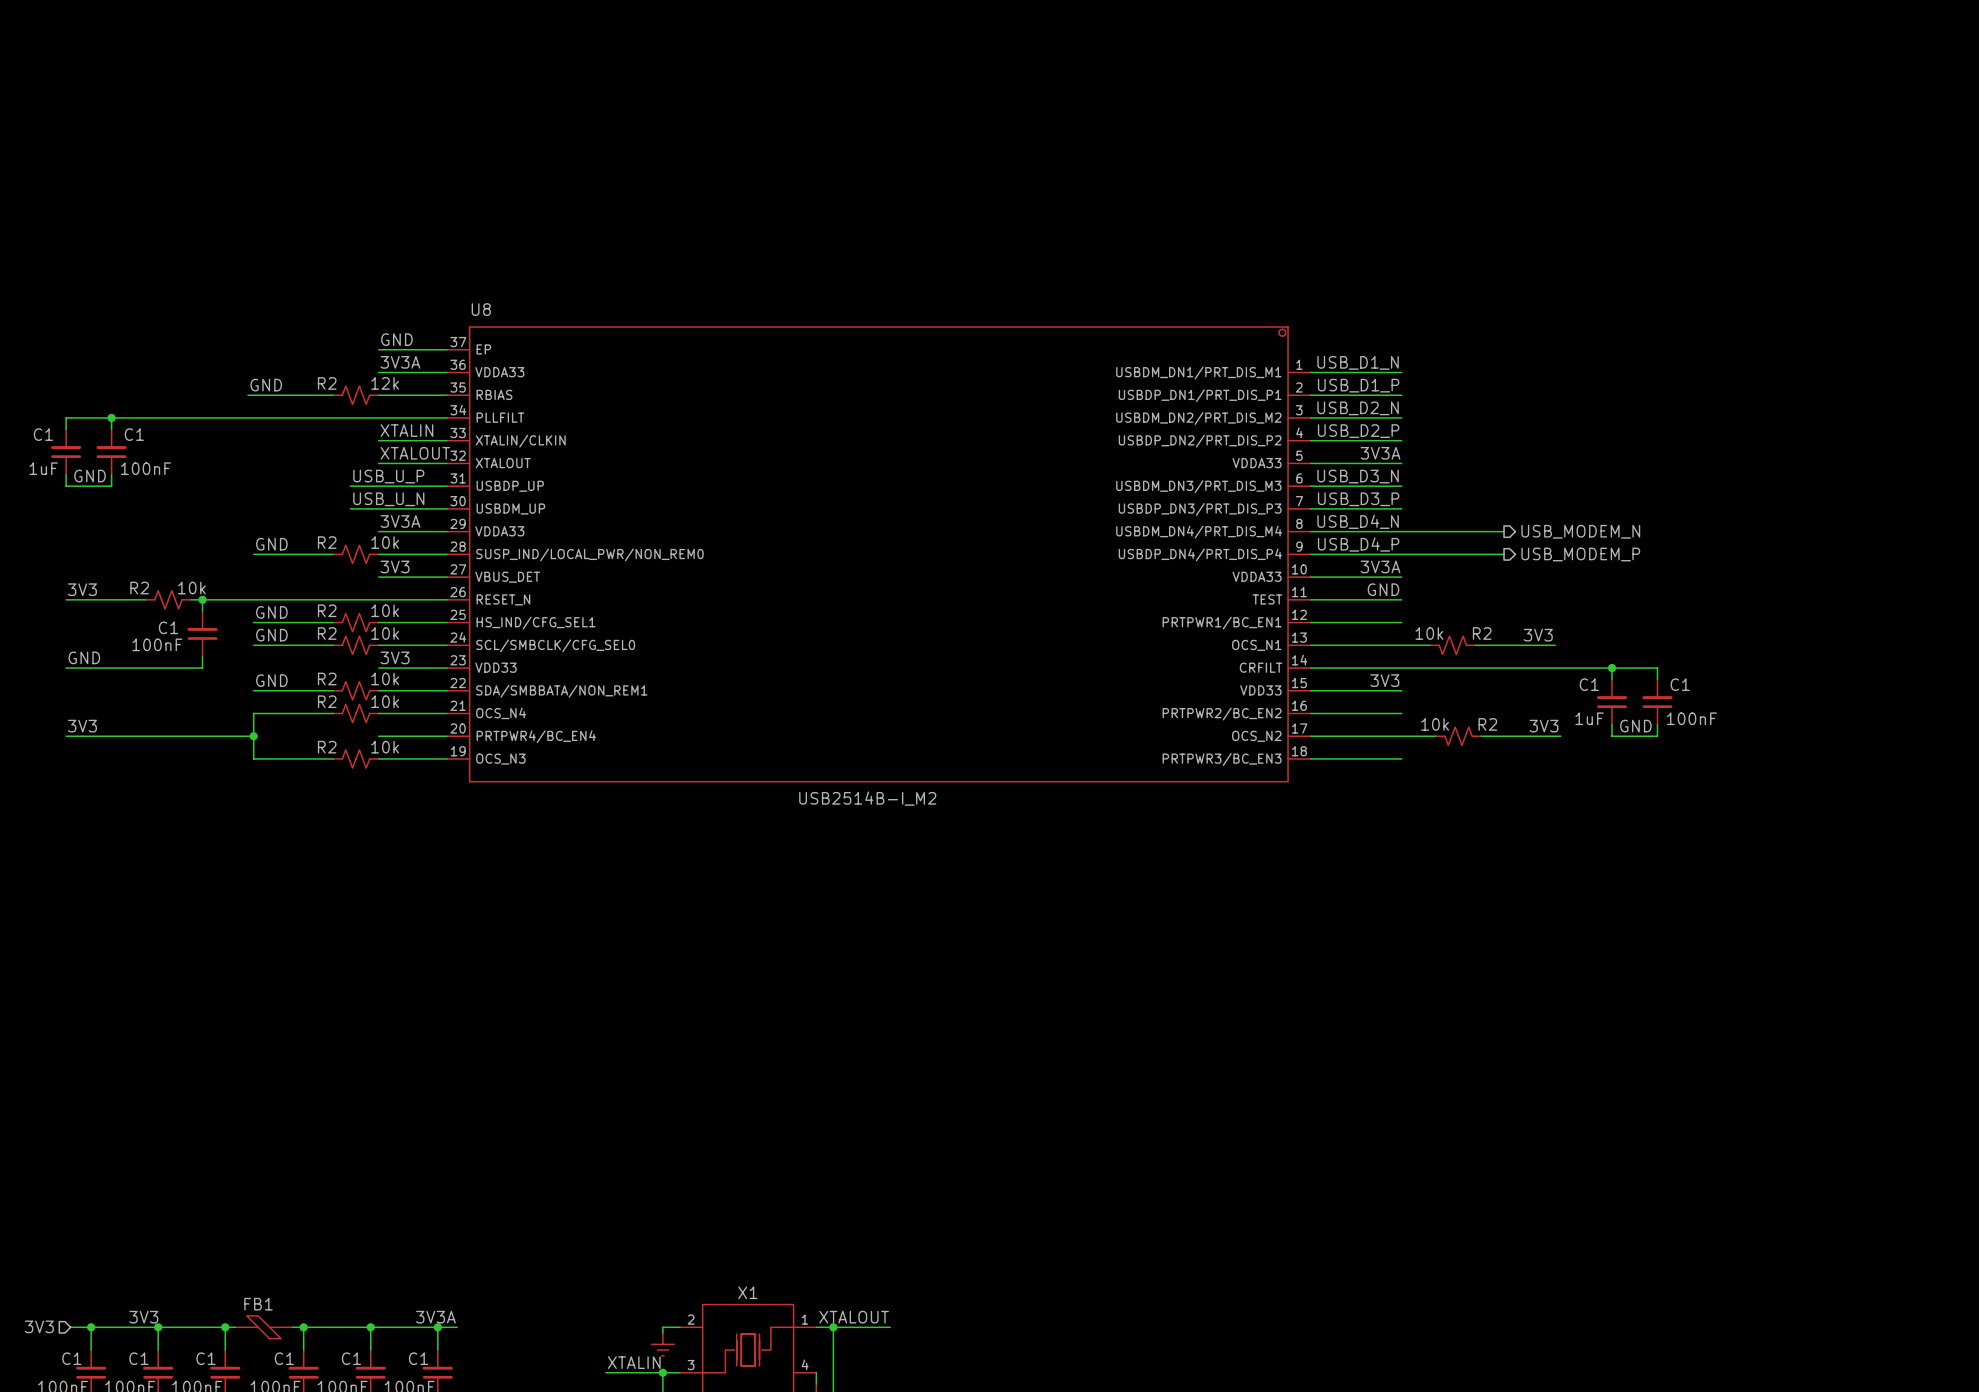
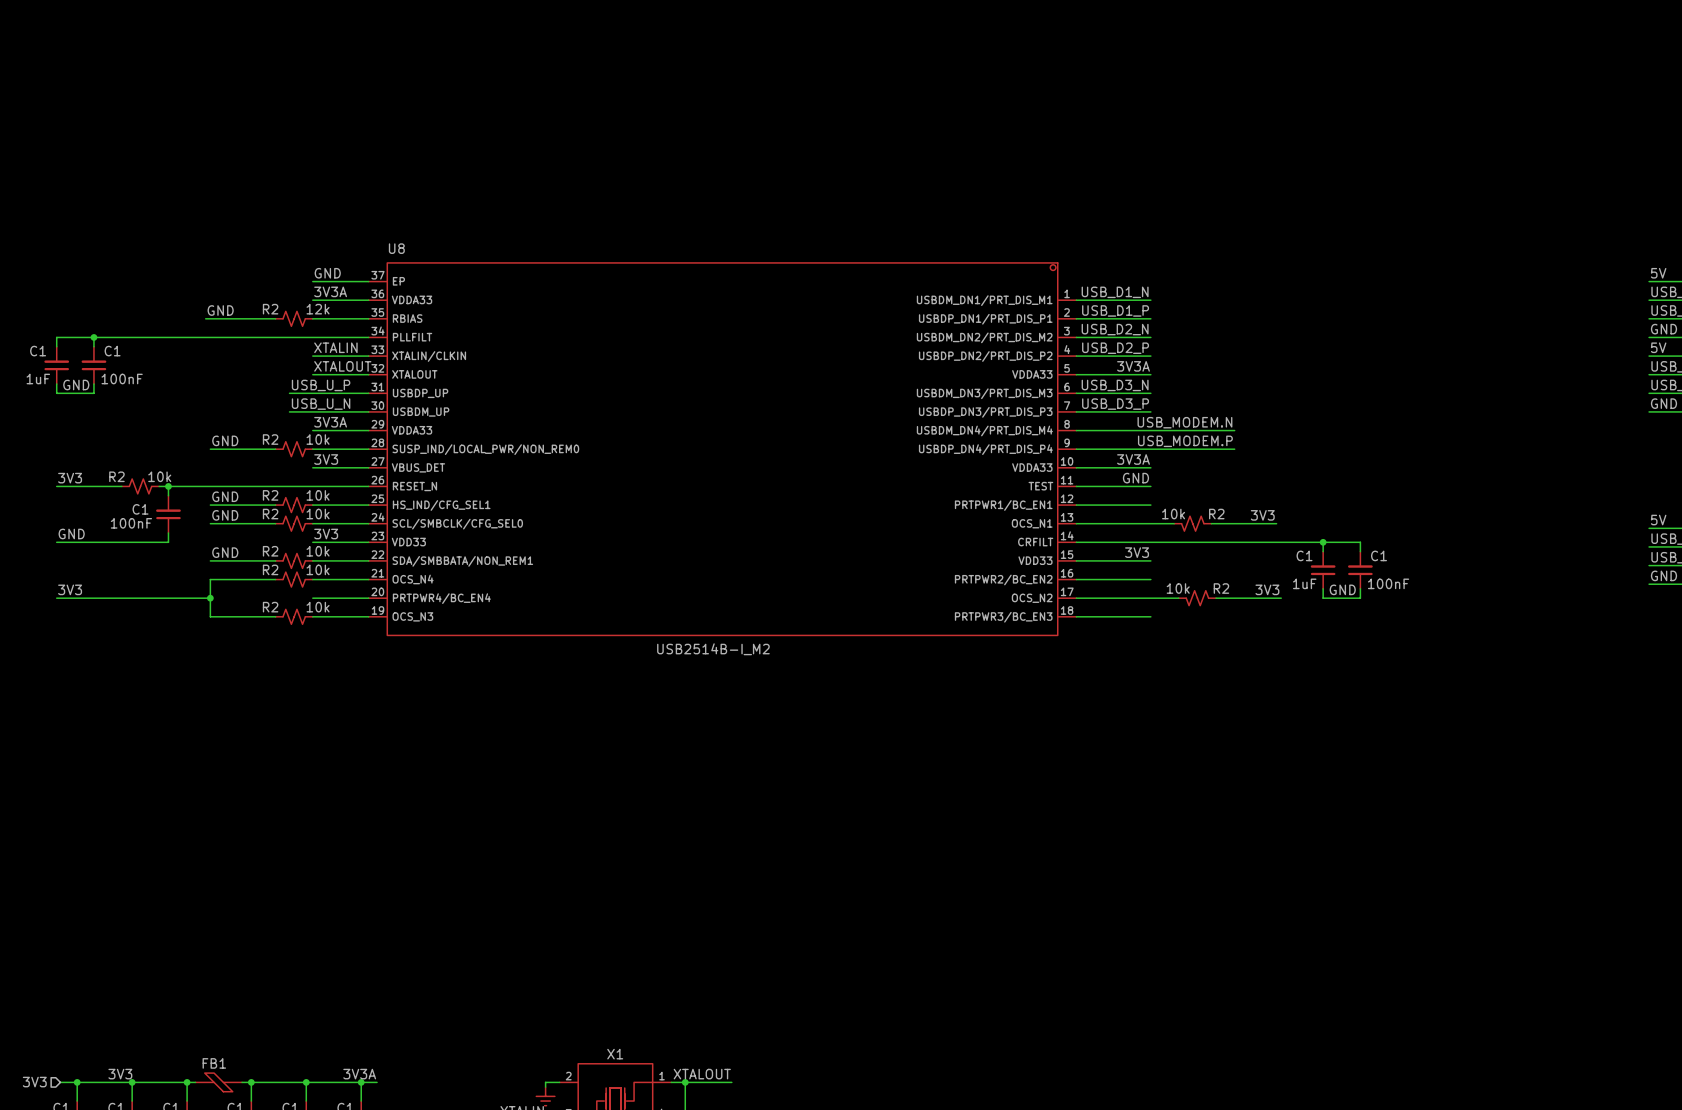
label: USB_D4_N (1358, 521) -> USB_MODEM.N (1184, 422)
hierarchical label: USB_MODEM_N (1580, 531) -> none
label: USB_D4_P (1358, 544) -> USB_MODEM.P (1185, 441)
hierarchical label: USB_MODEM_P (1580, 554) -> none

